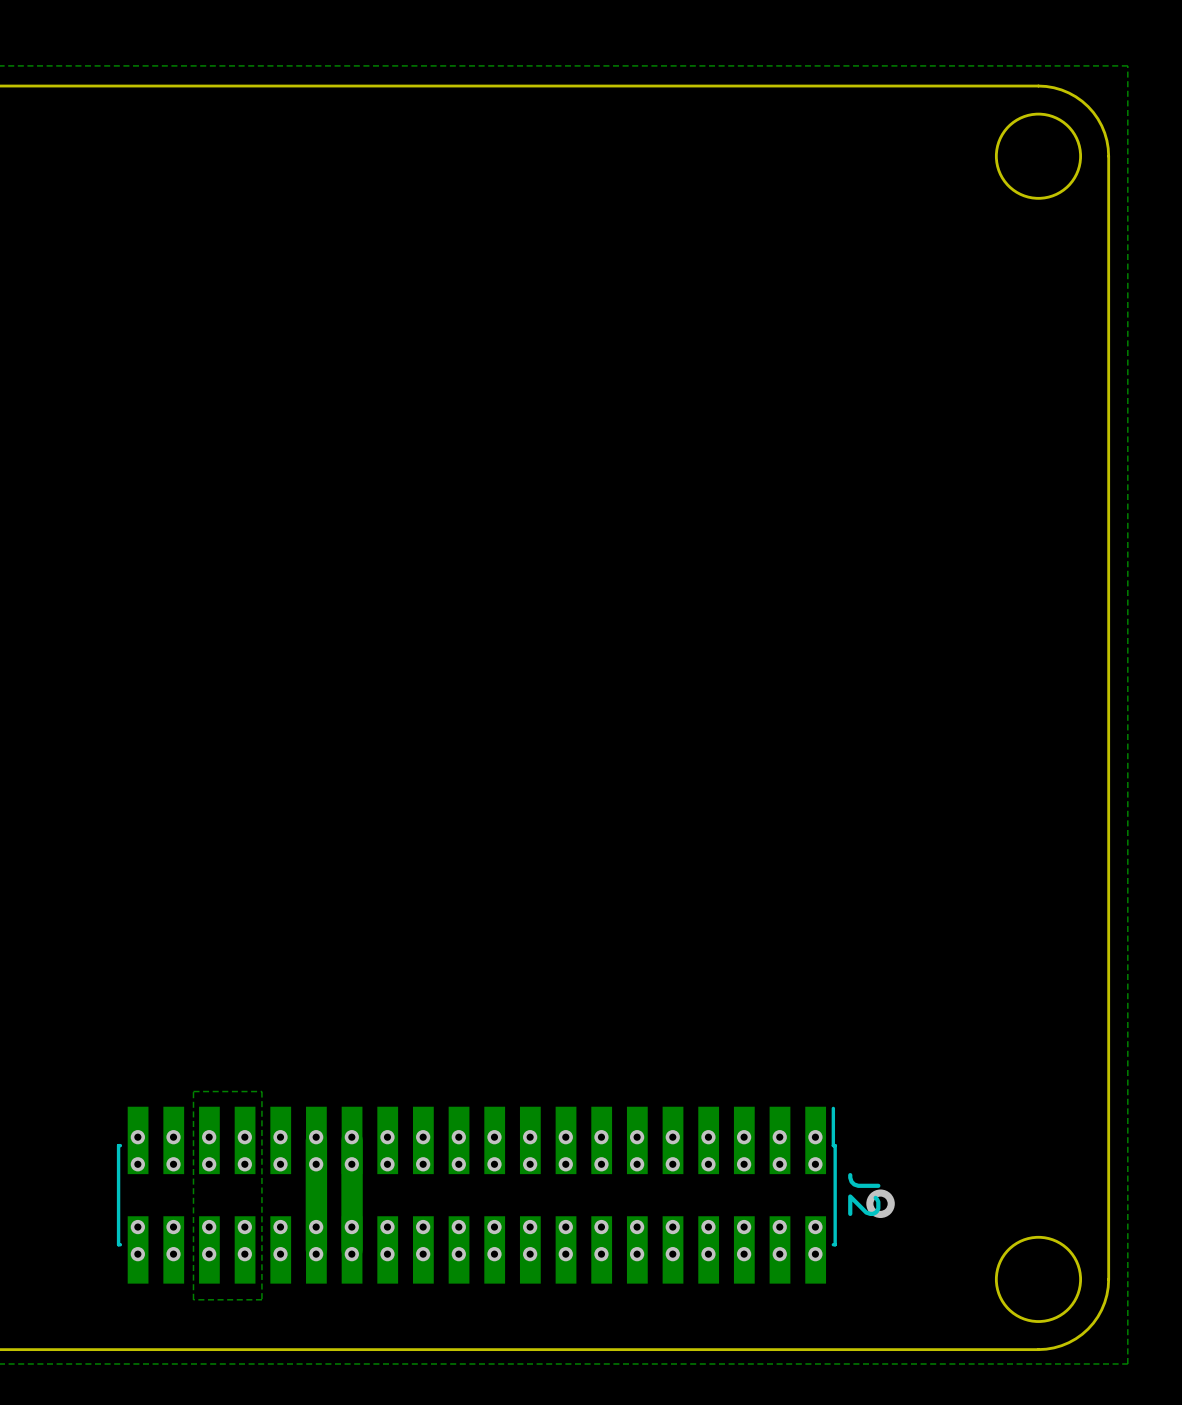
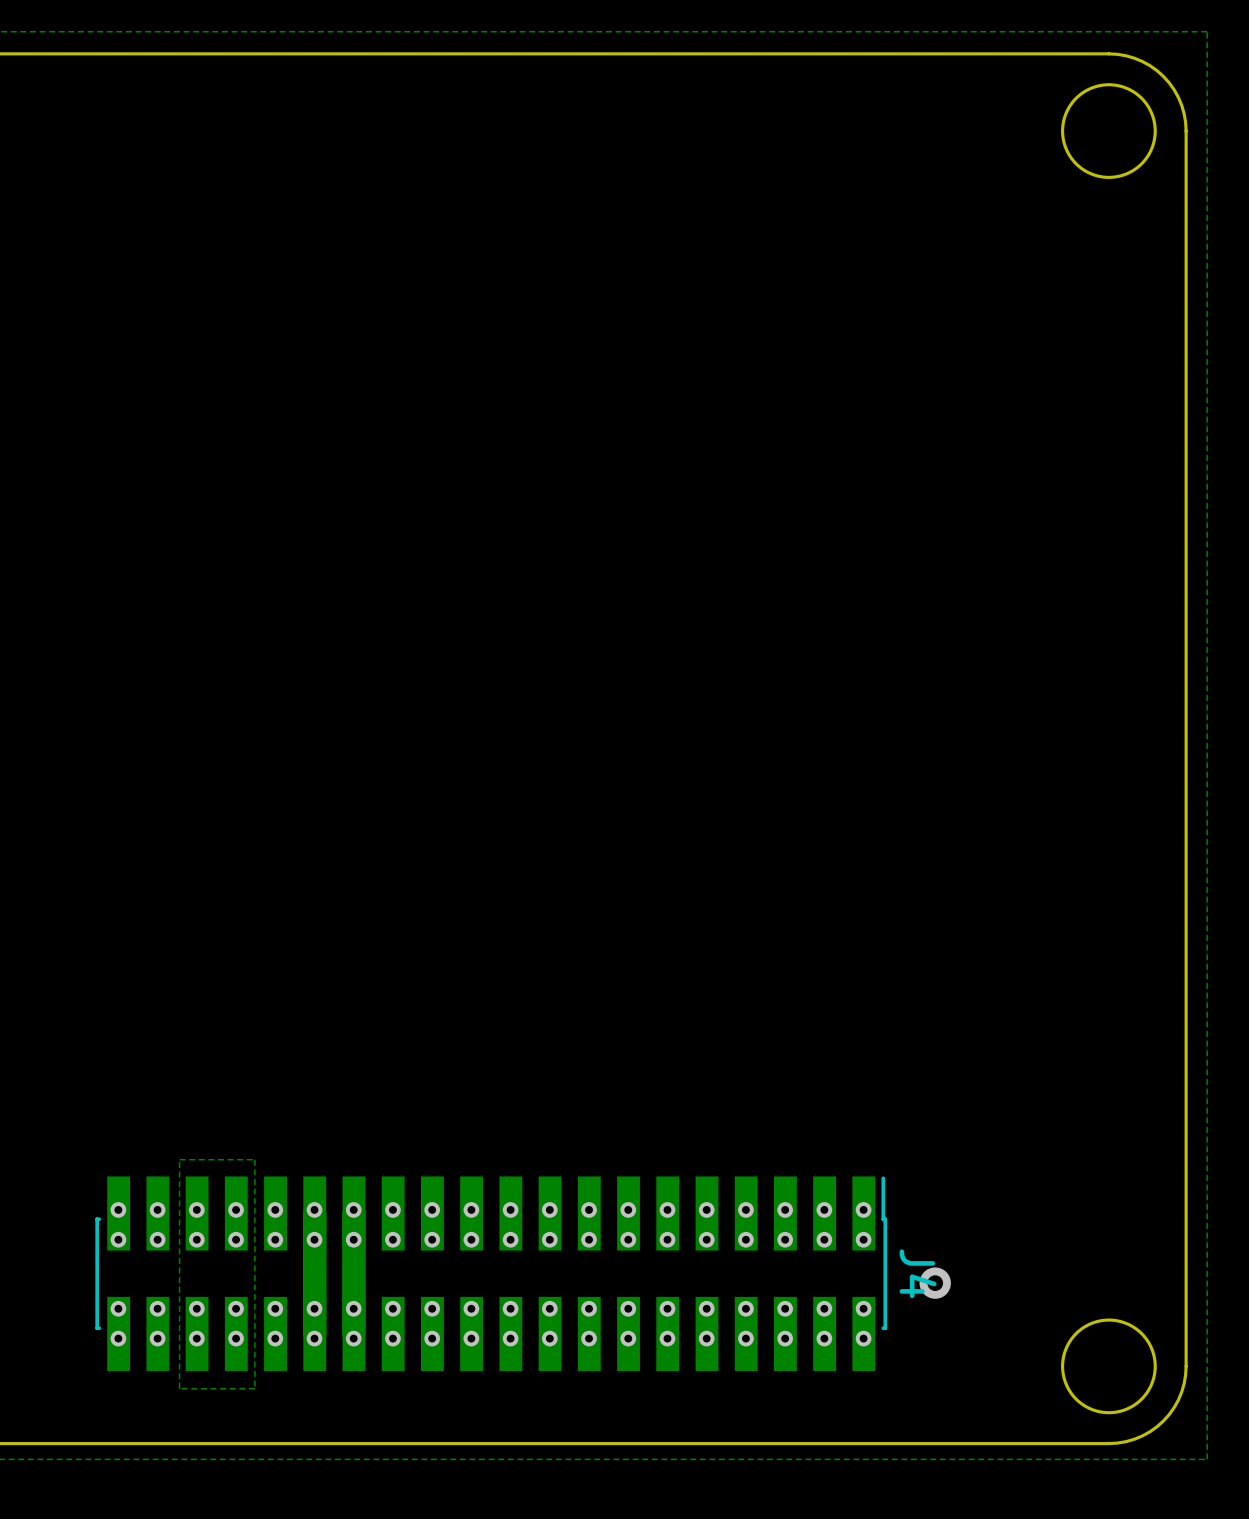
J2 name: J2 (864, 1194) -> J4 (918, 1273)

